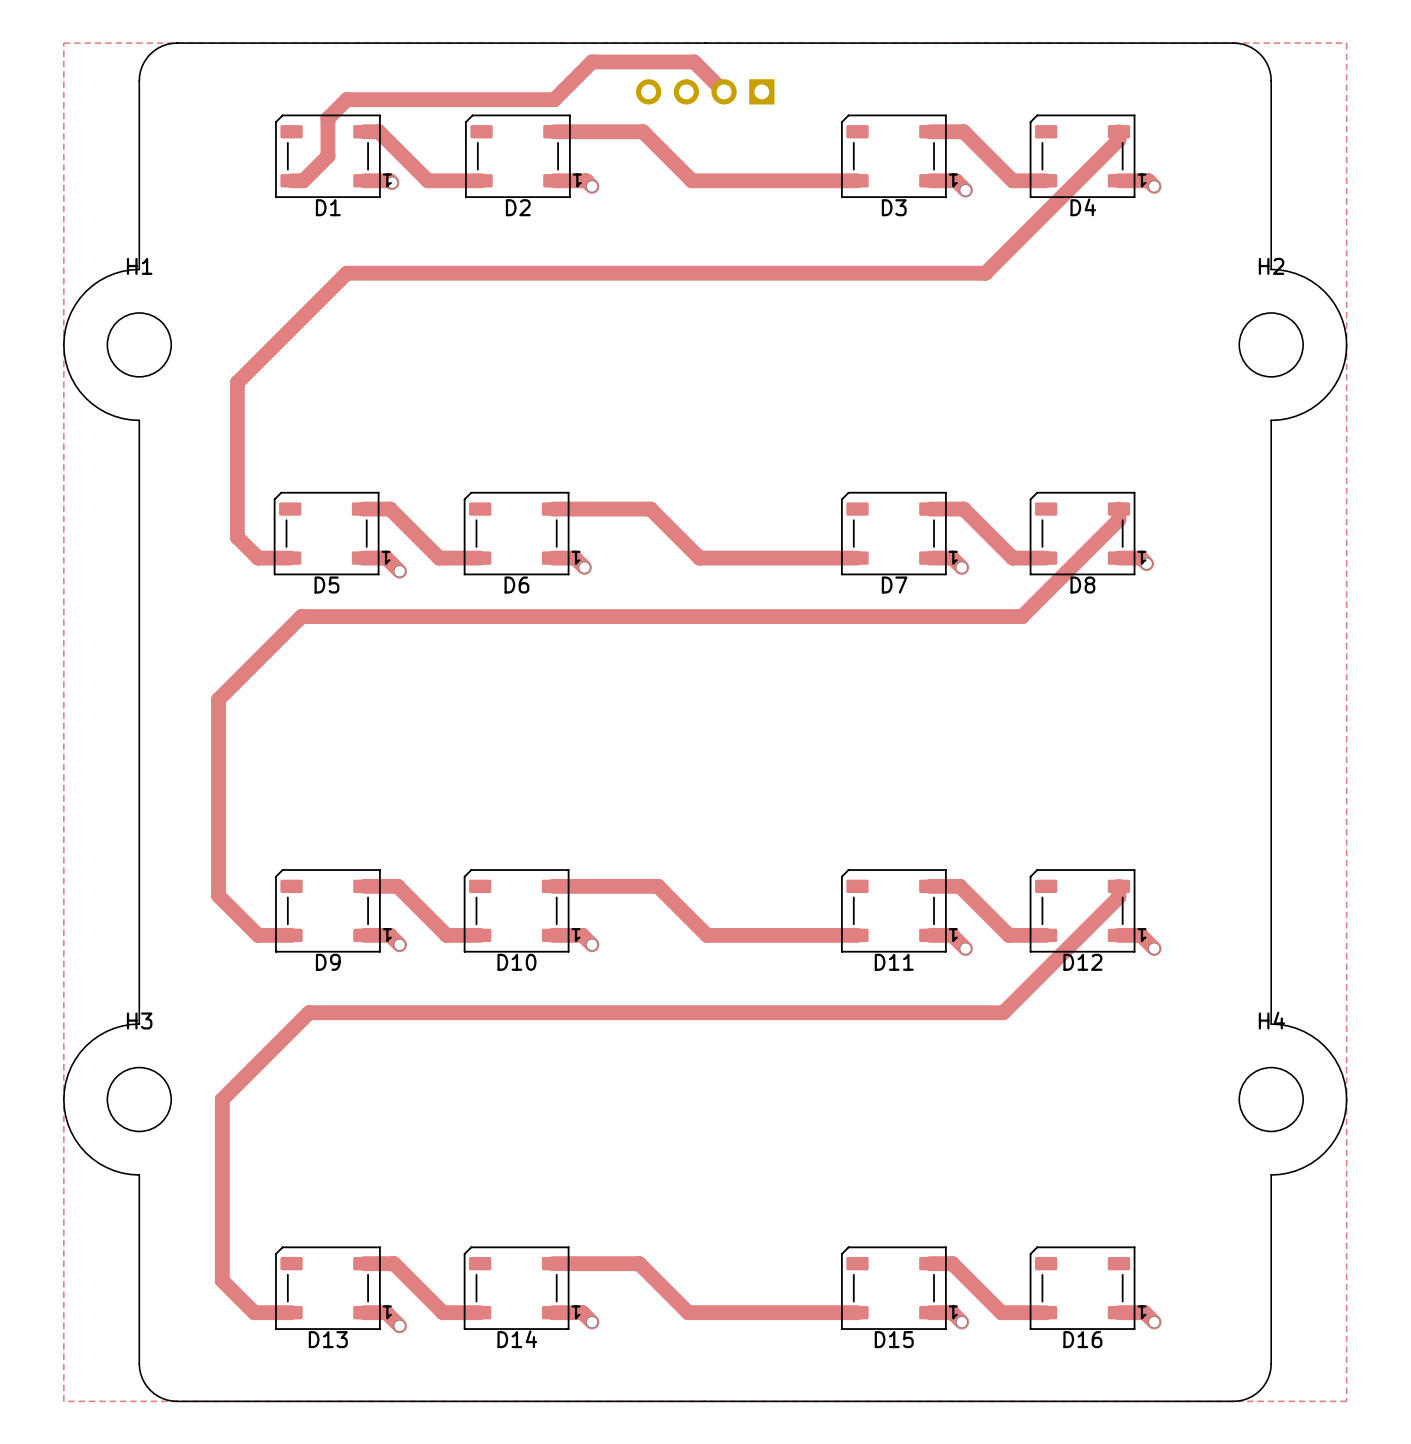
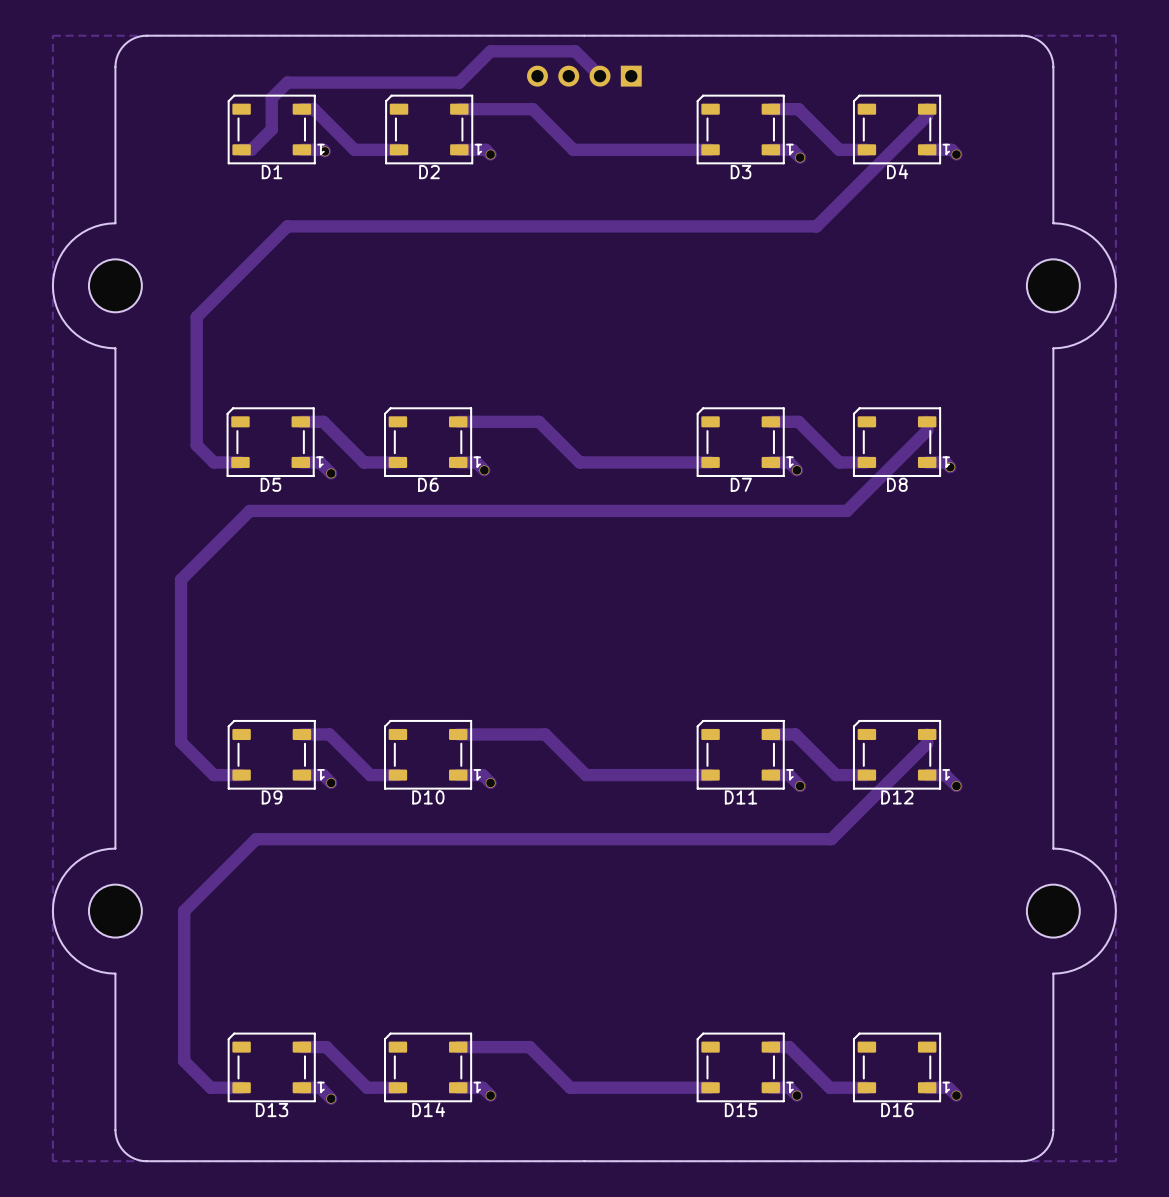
H1 name: H1 (139, 266) -> none
H2 name: H2 (1271, 266) -> none
H3 name: H3 (139, 1020) -> none
H4 name: H4 (1271, 1020) -> none

